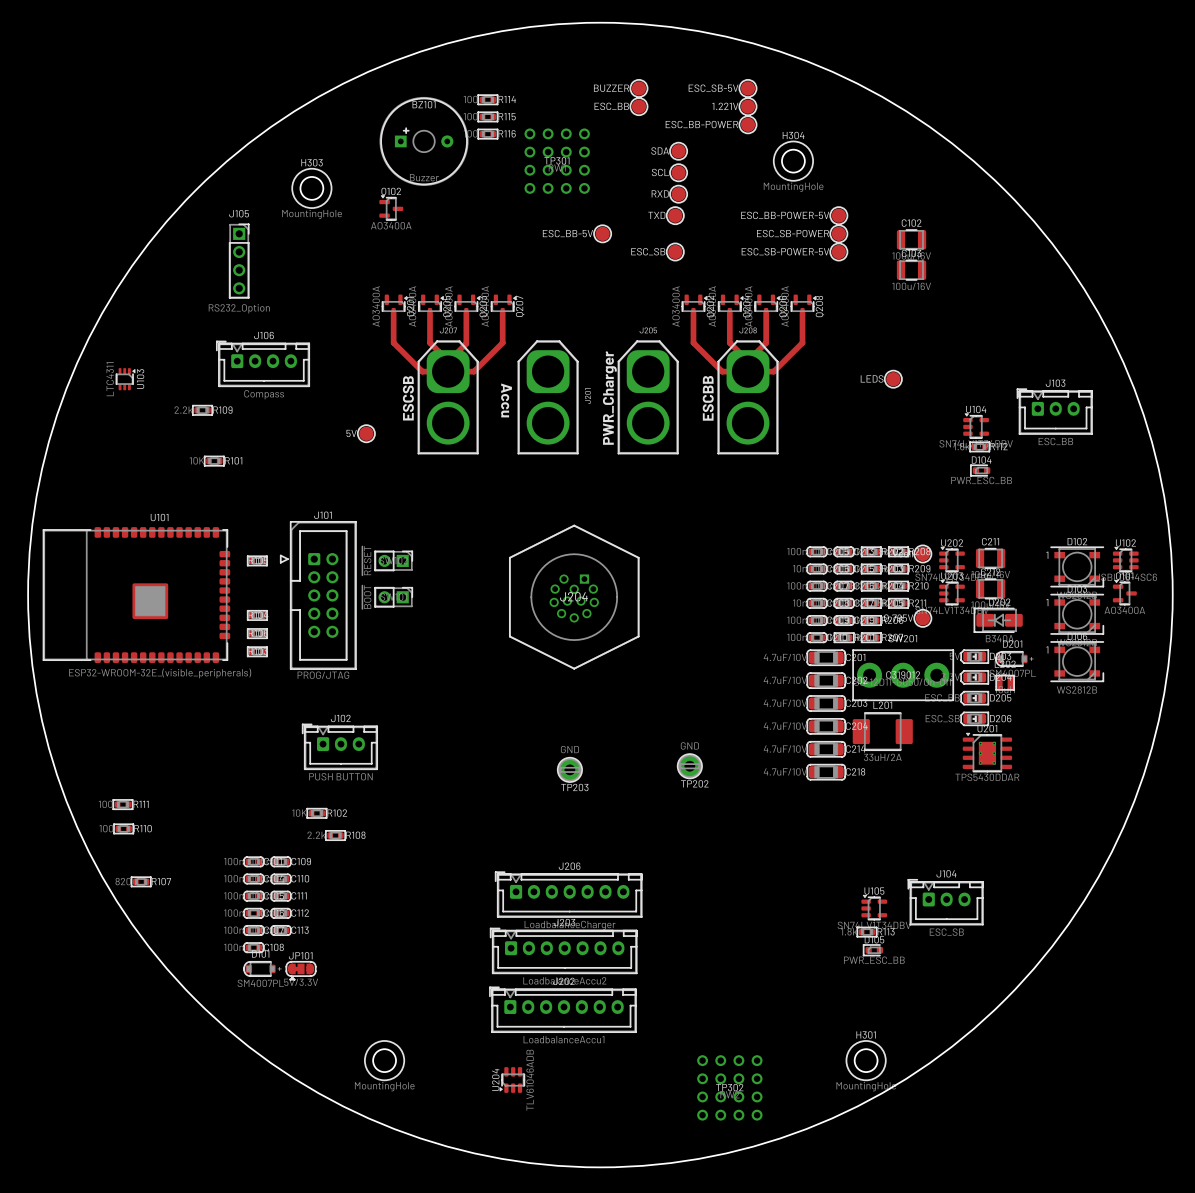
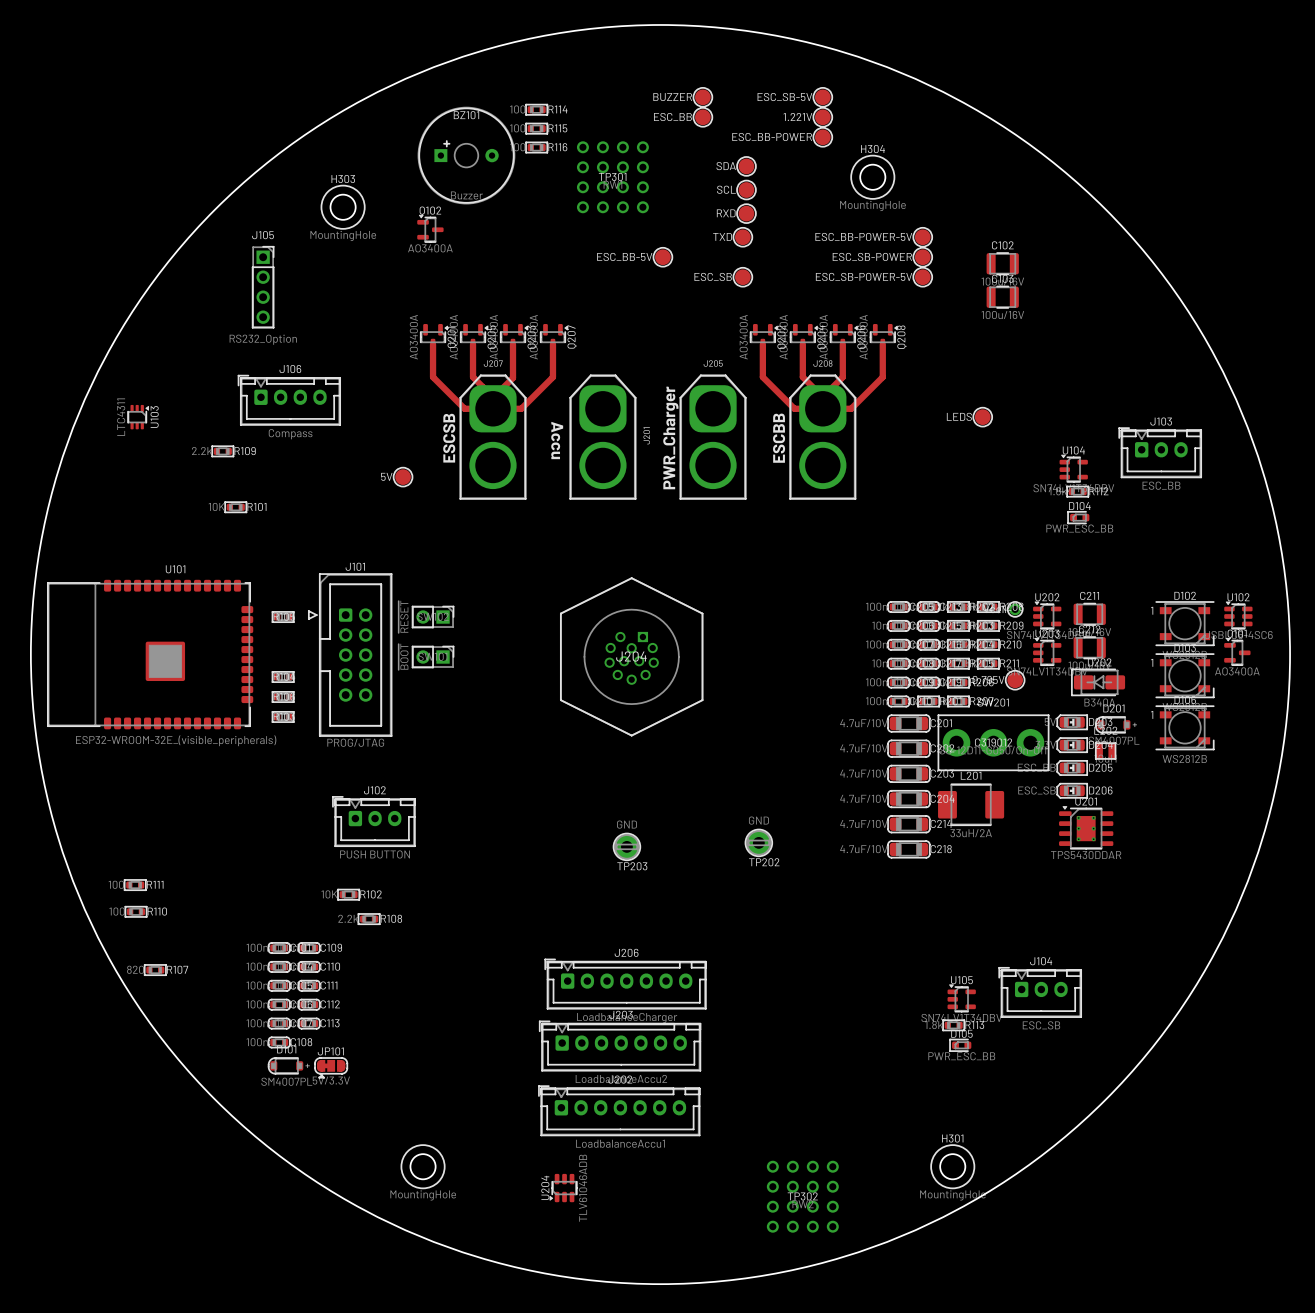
part footprint: [913, 545, 932, 563] -> [1007, 601, 1024, 618]

